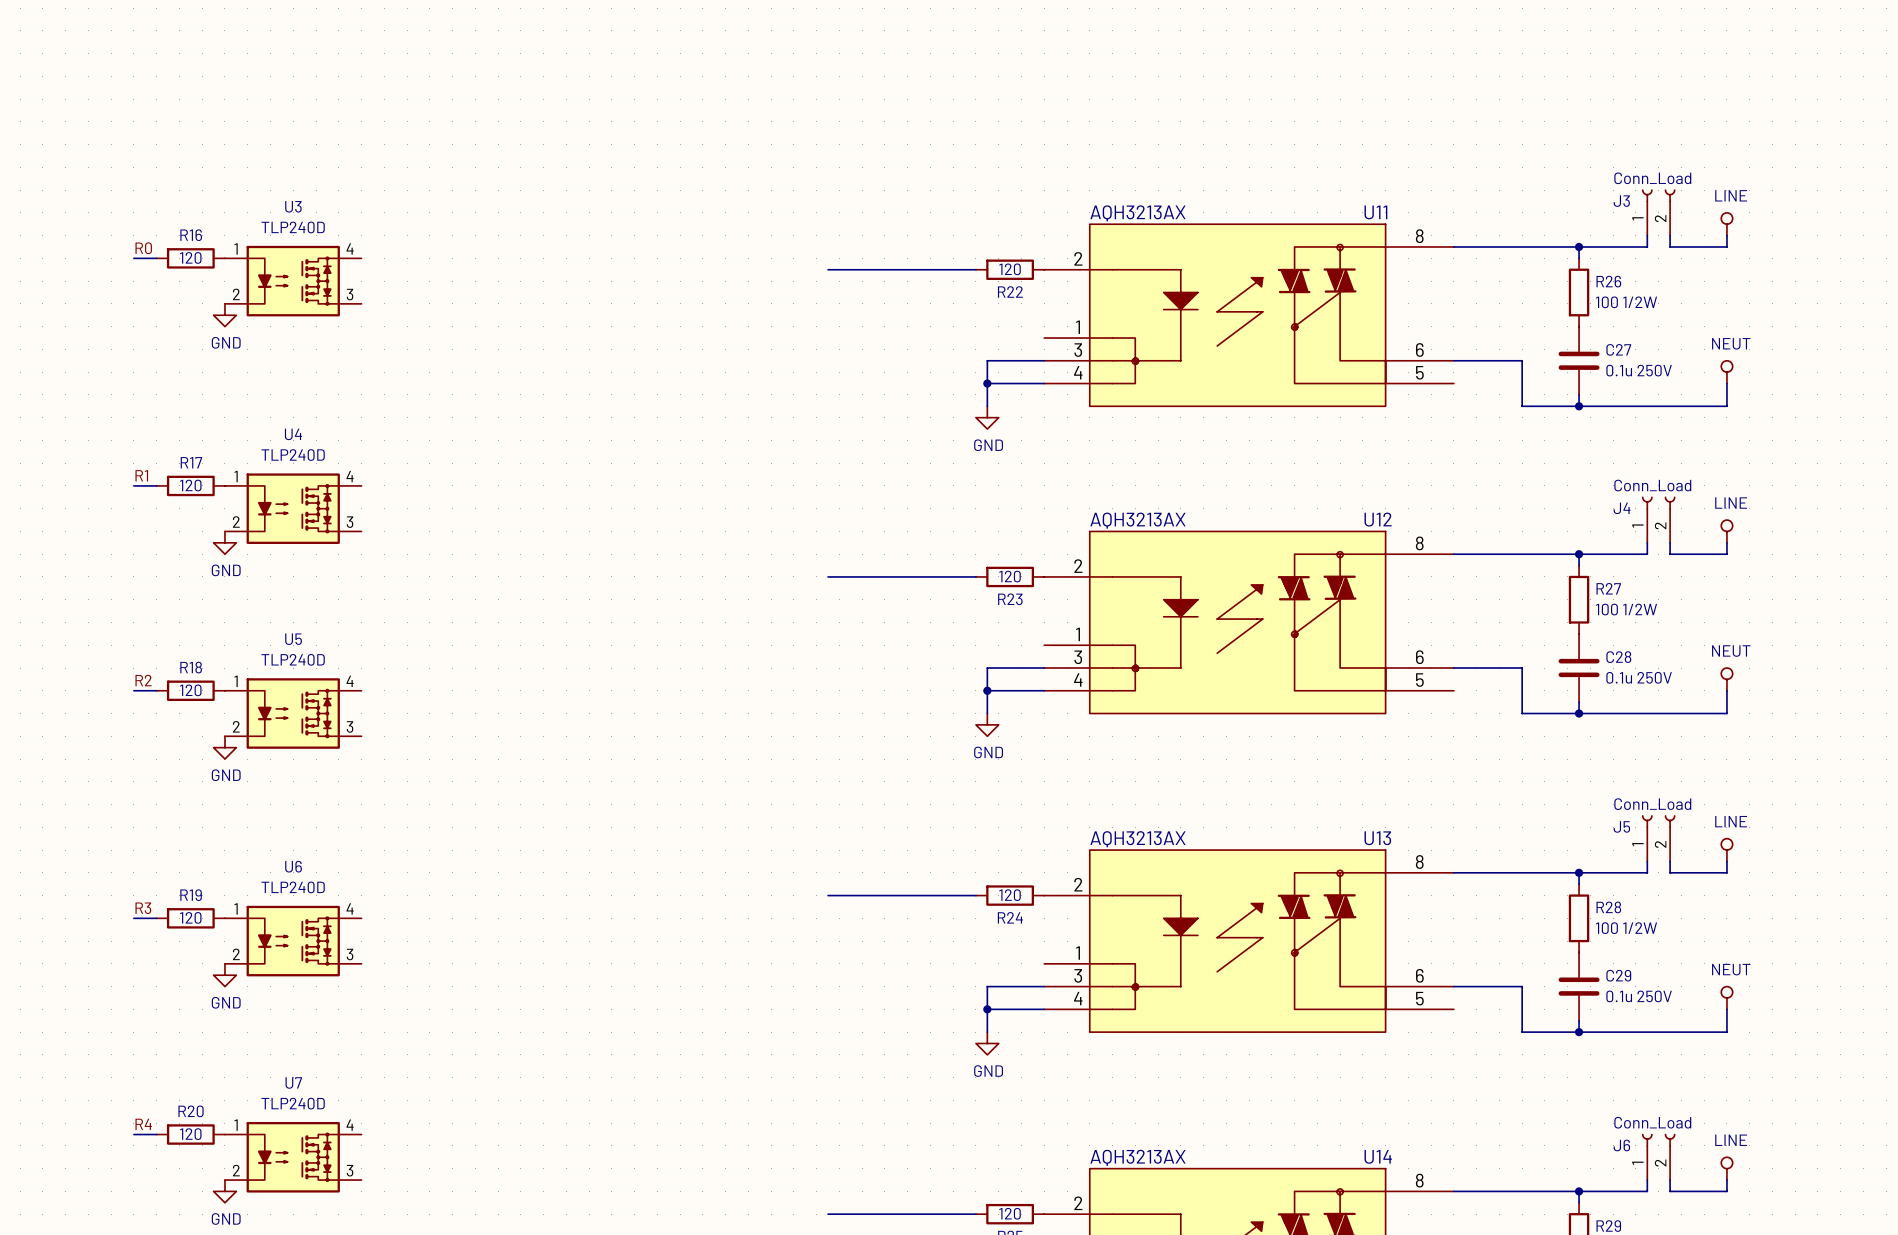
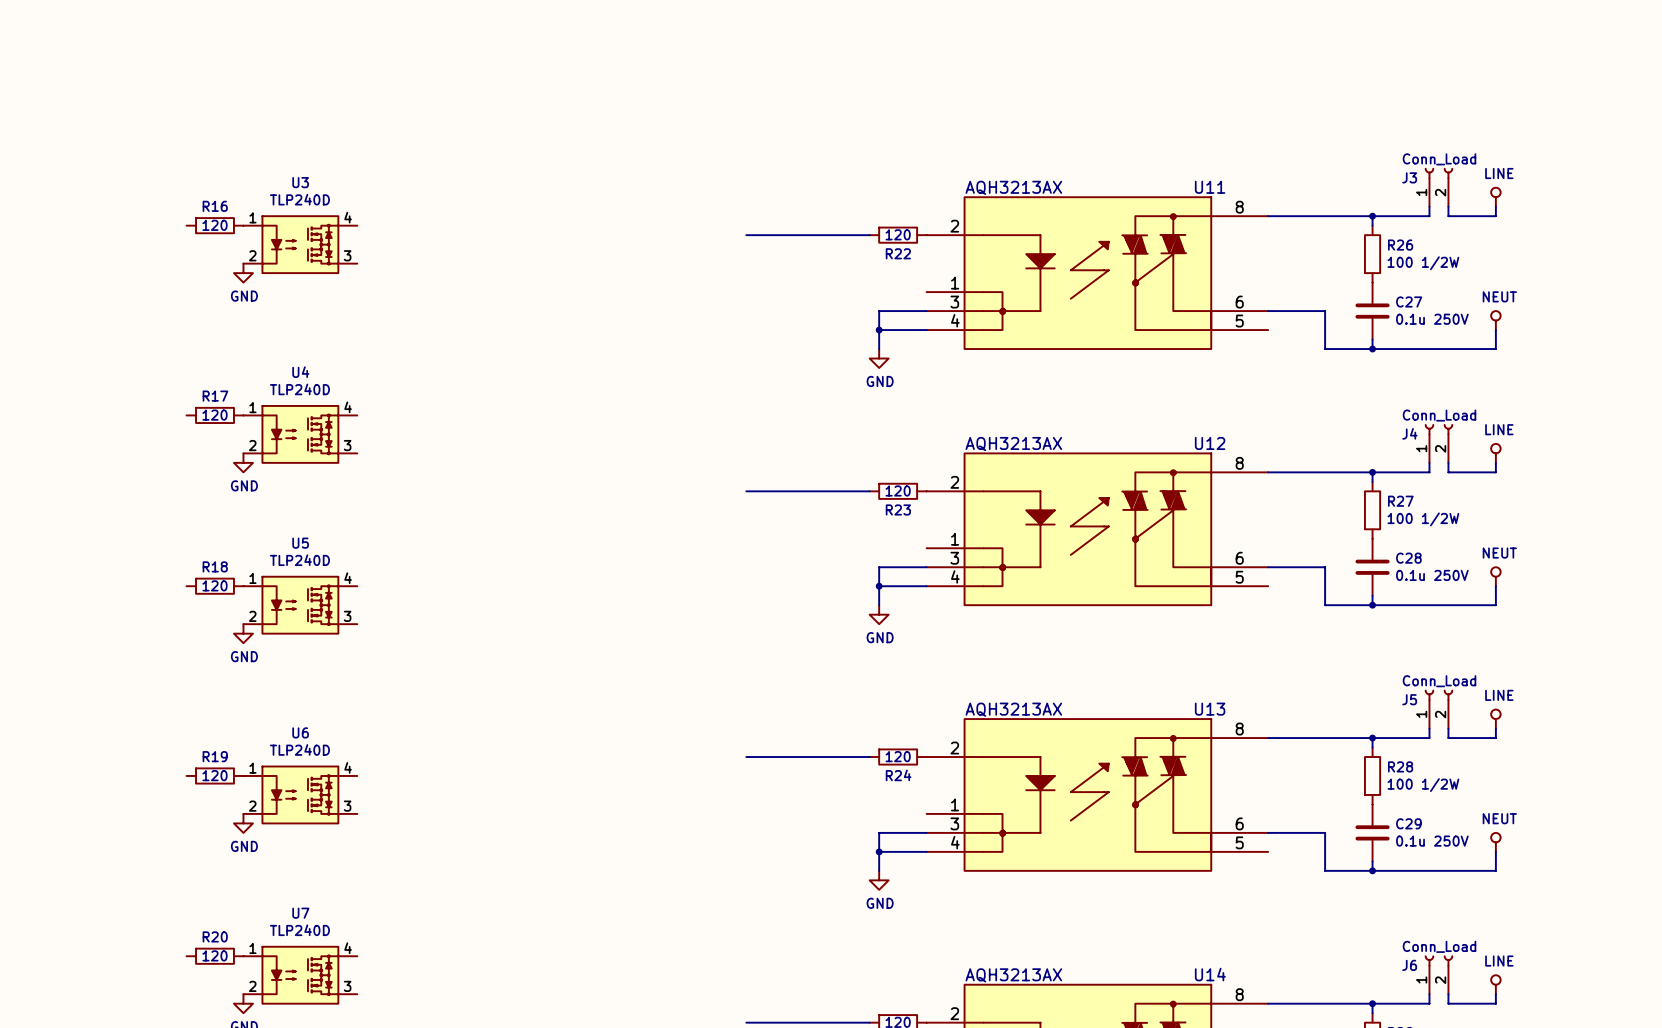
label: R0 (143, 248) -> none
wire: (133, 258) (156, 258) -> none
label: R1 (141, 475) -> none
wire: (133, 485) (156, 485) -> none
label: R2 (143, 680) -> none
wire: (133, 690) (156, 690) -> none
label: R3 (143, 908) -> none
wire: (133, 918) (156, 918) -> none
label: R4 (143, 1124) -> none
wire: (133, 1134) (156, 1134) -> none

